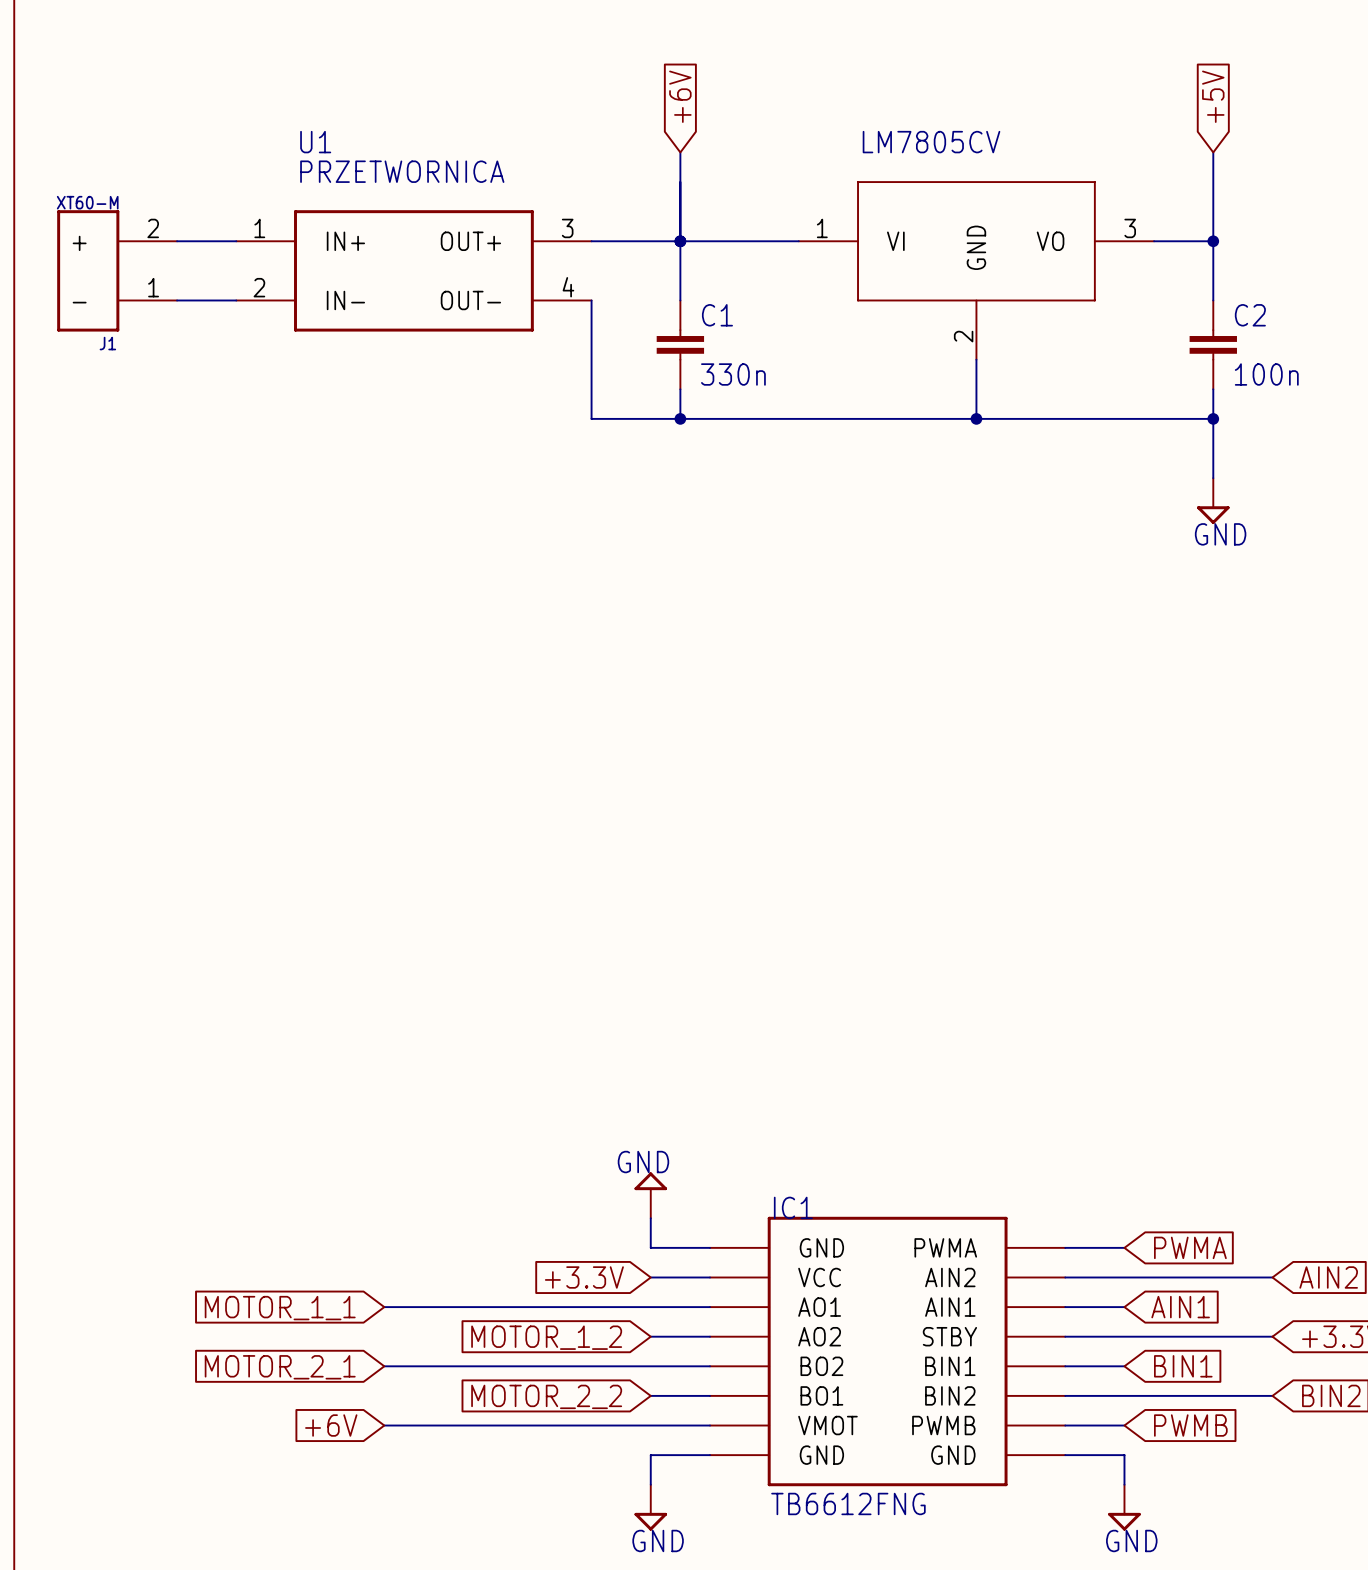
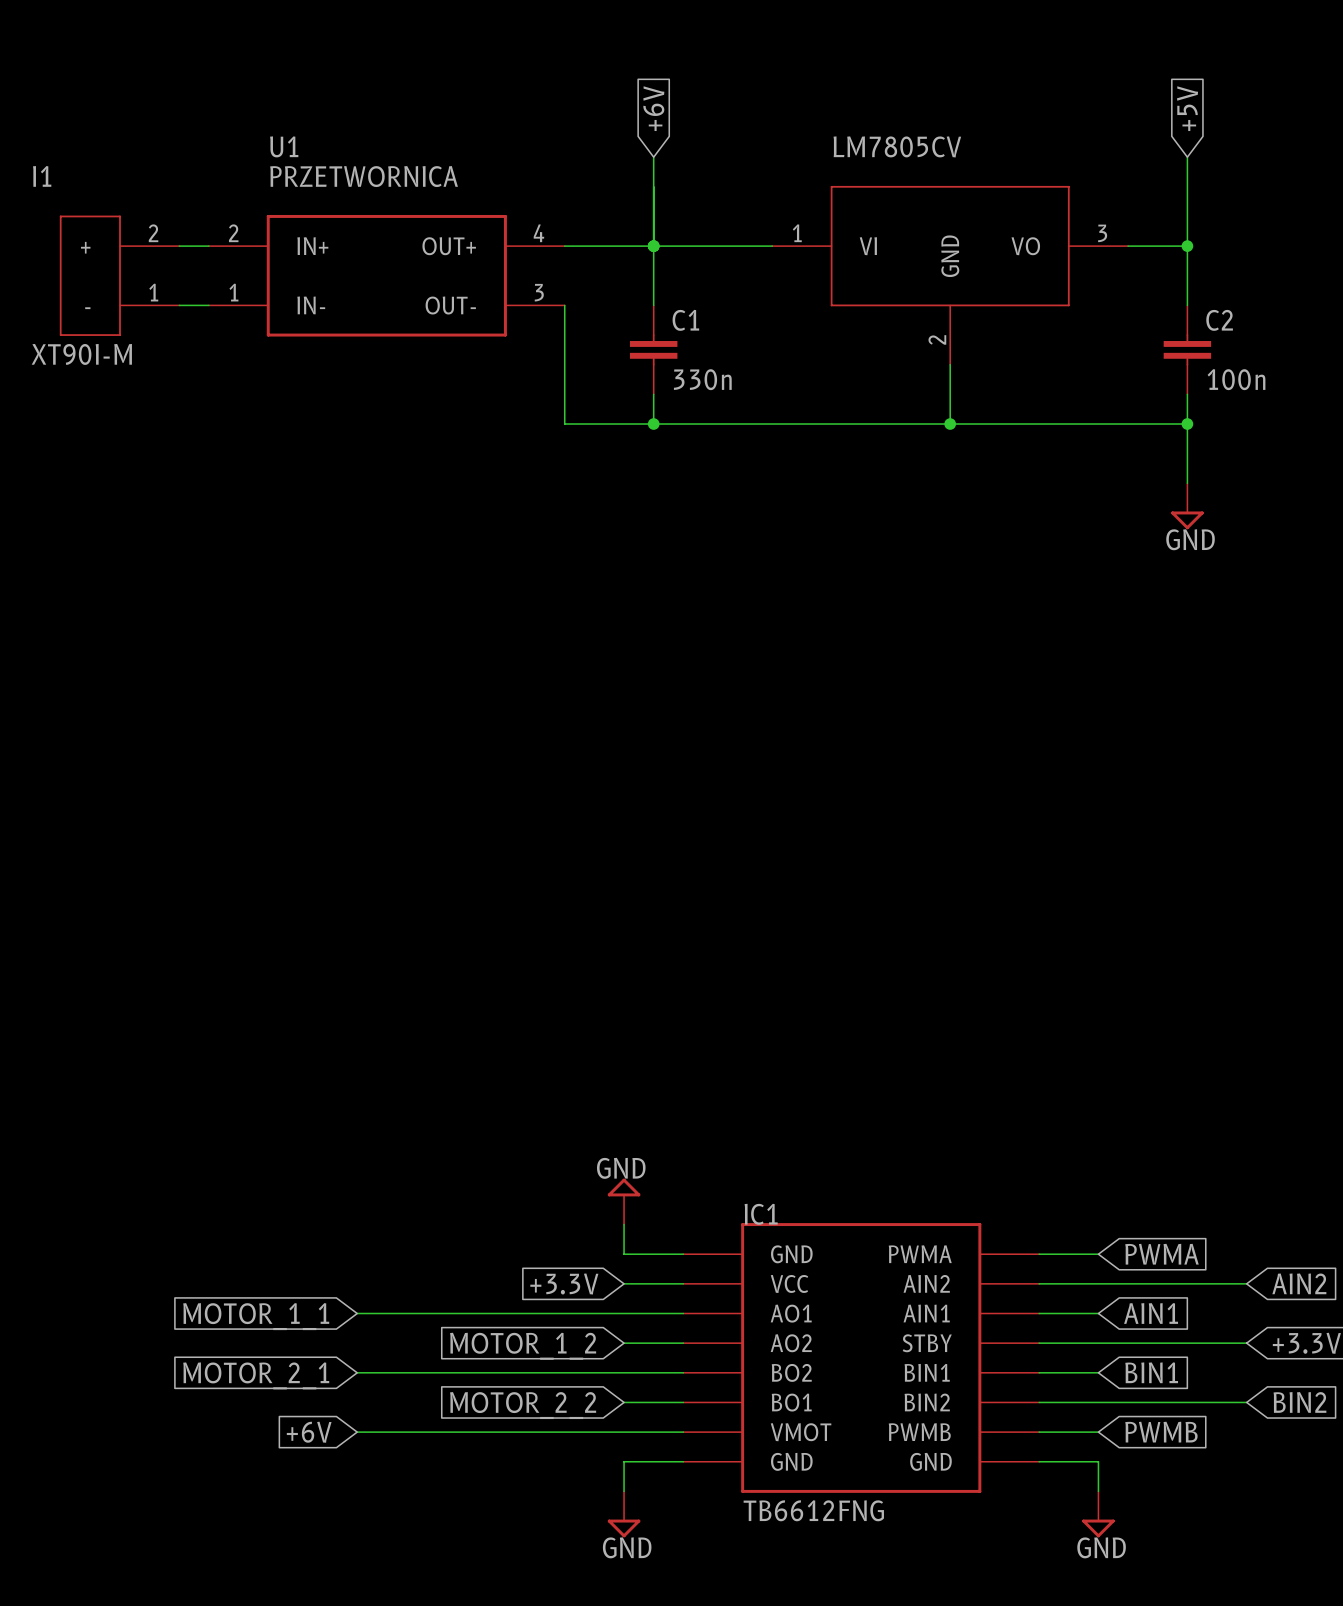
U1 pin number: 1 (259, 228) -> 2 (233, 233)
U1 pin number: 3 (567, 228) -> 4 (538, 233)
J1: XT60-M (117, 270) -> none
I1: none -> XT90I-M (119, 275)
U1 pin number: 2 (259, 287) -> 1 (233, 292)
U1 pin number: 4 (568, 287) -> 3 (539, 292)

